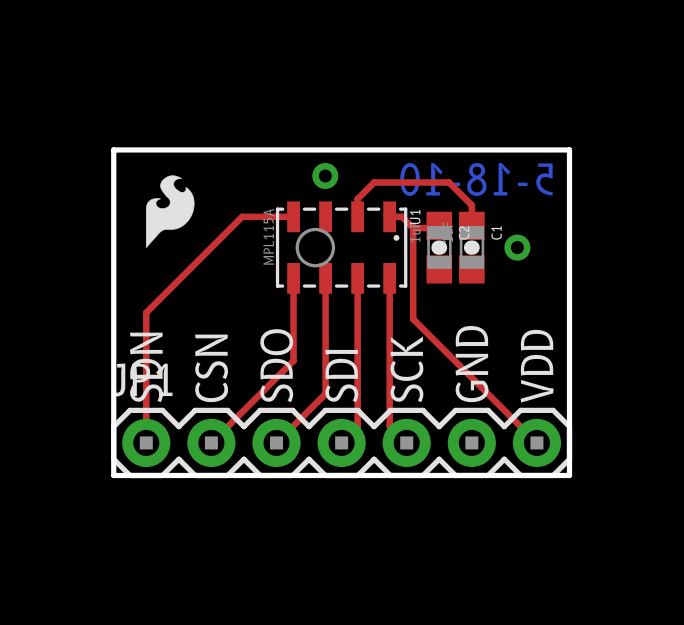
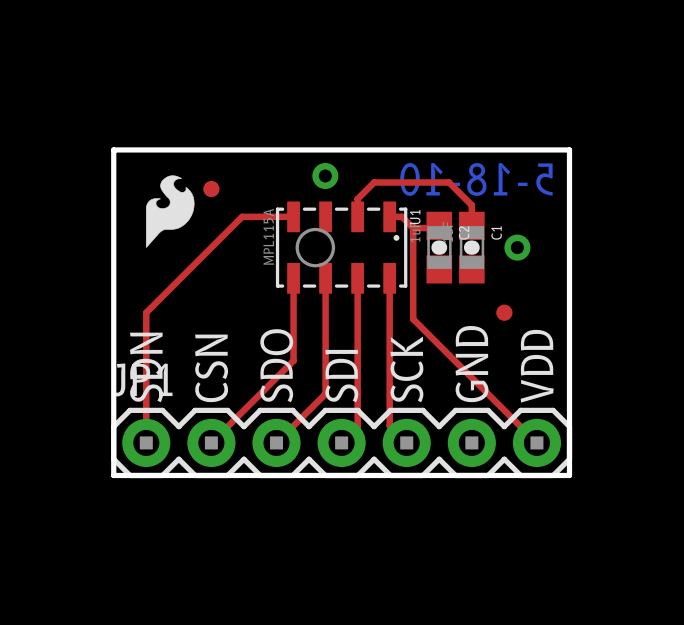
part: none -> (211, 189)
part: none -> (504, 312)

